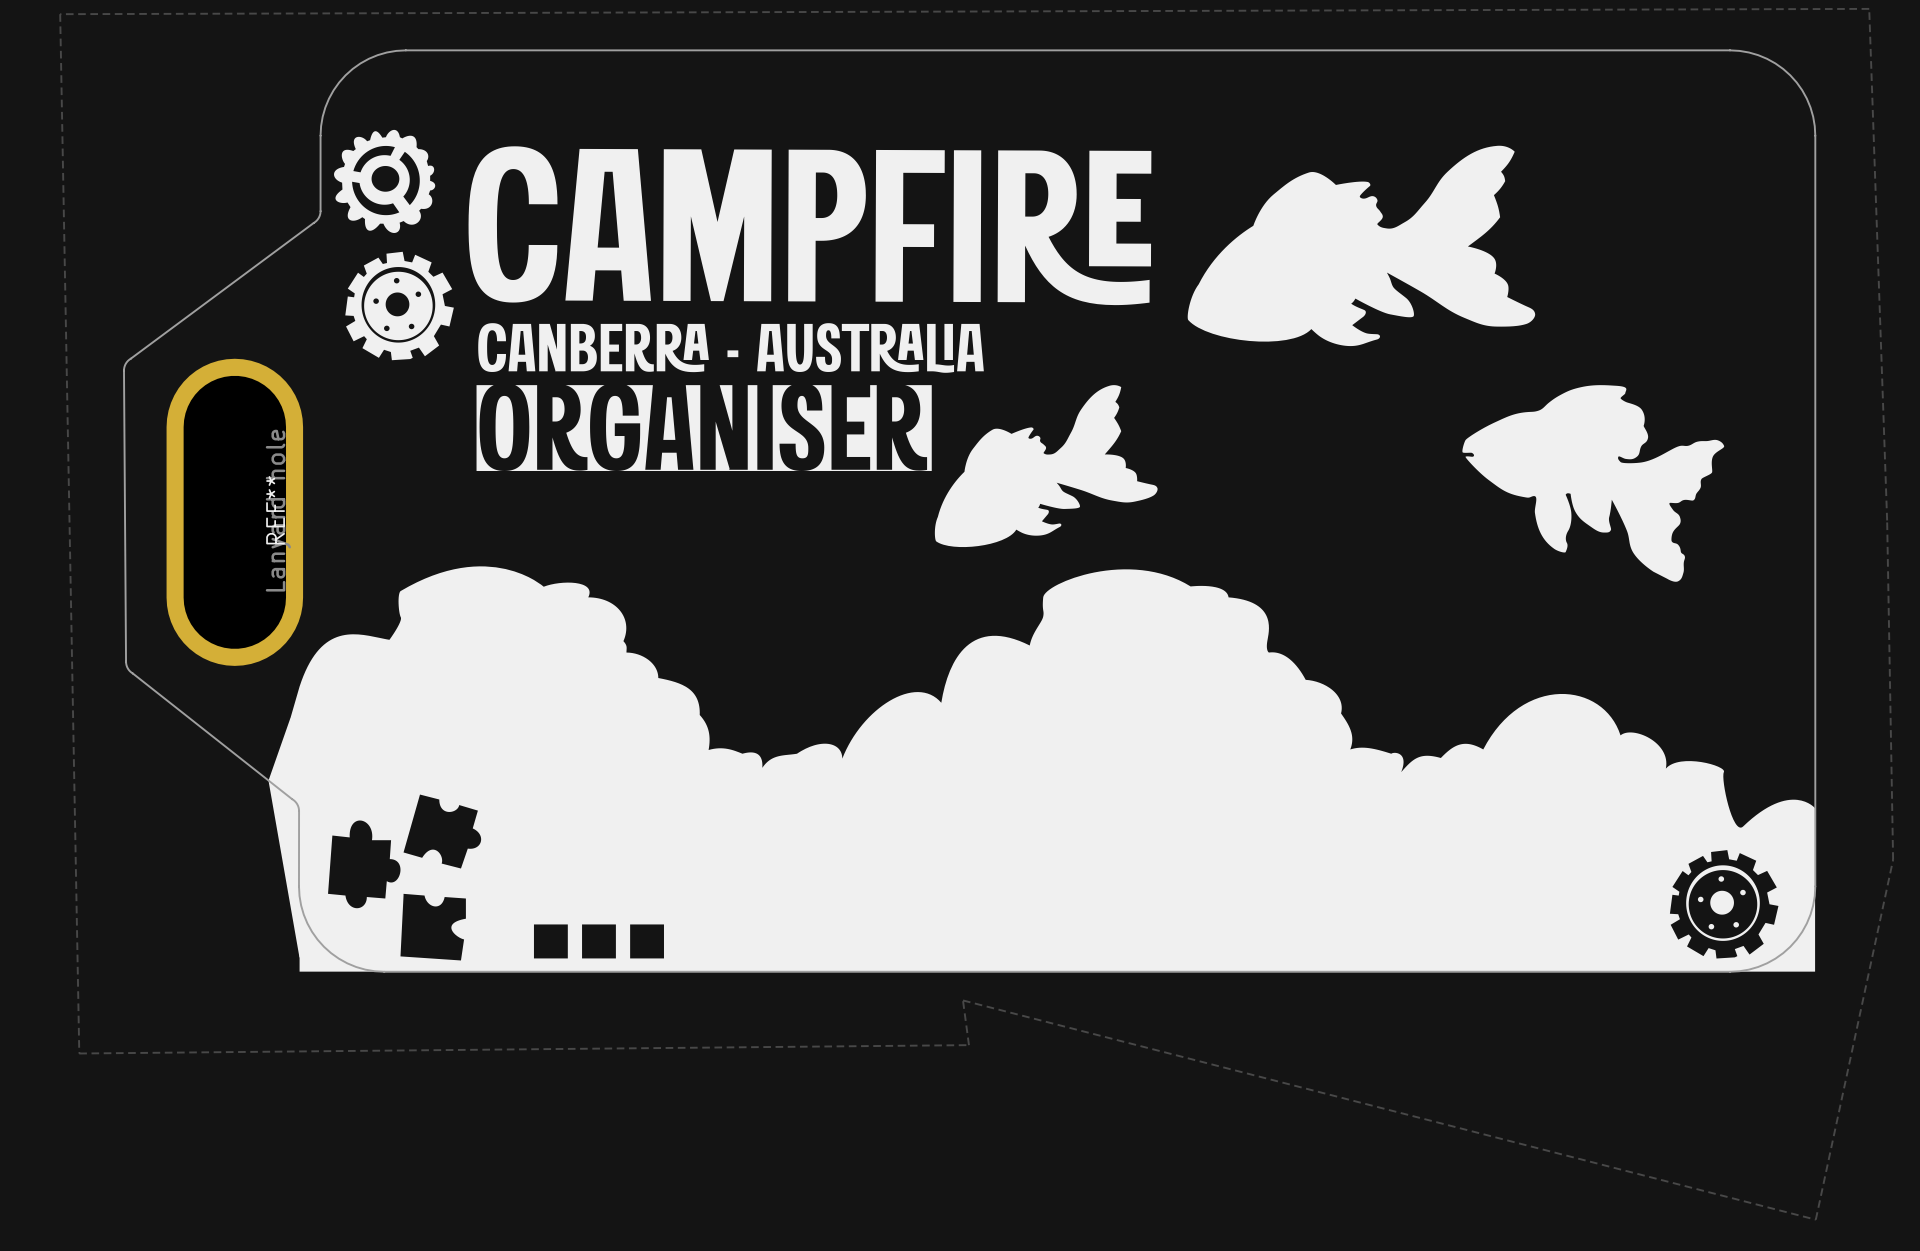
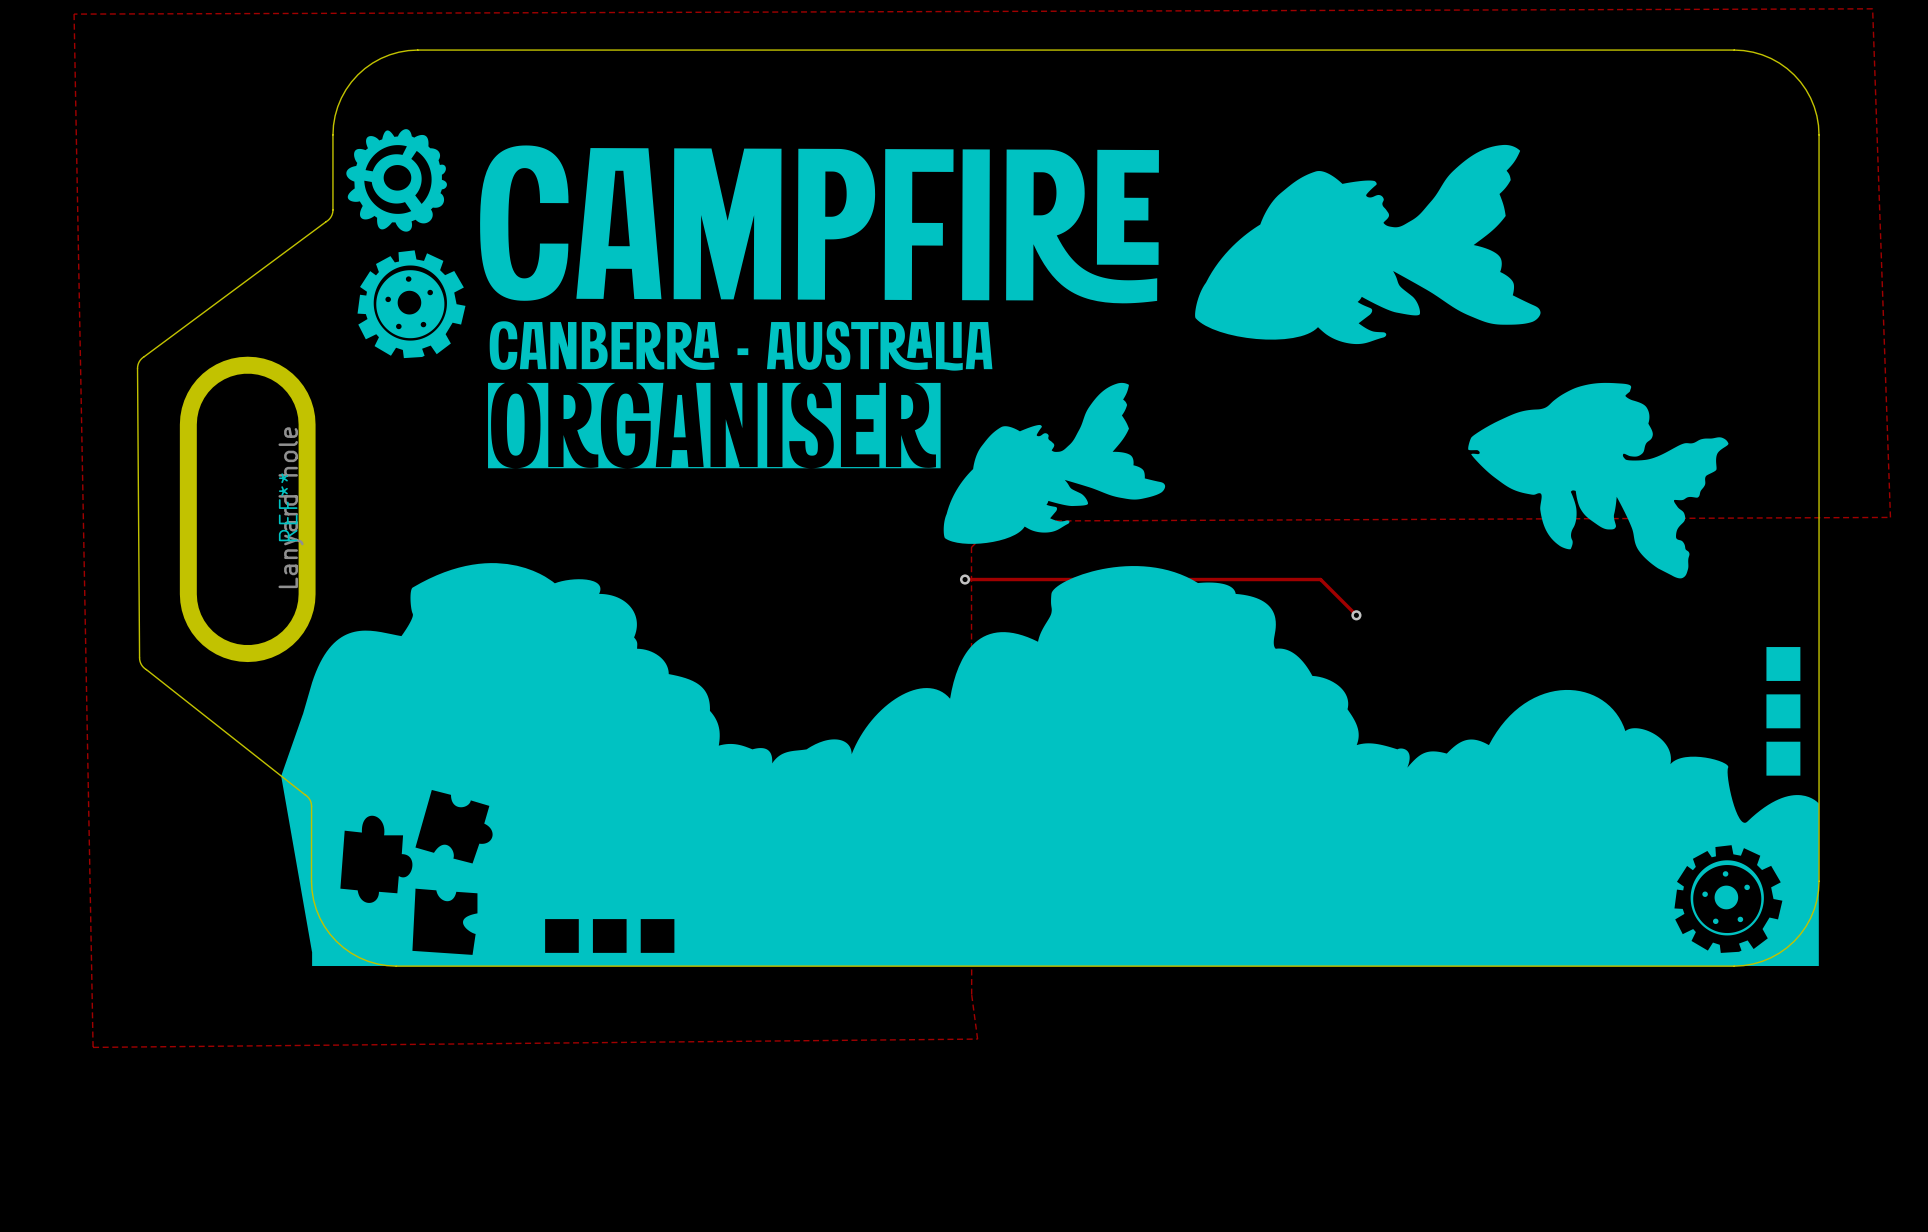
zone outline: (1887, 520) (1893, 859) (1815, 1219) (962, 1000) -> (1890, 517) (998, 521) (971, 547) (971, 994)
track: none -> (965, 579) (1320, 579) (1356, 615)
via: none -> (965, 579)
via: none -> (1356, 615)
drawing: none -> [1766, 647, 1801, 776]

